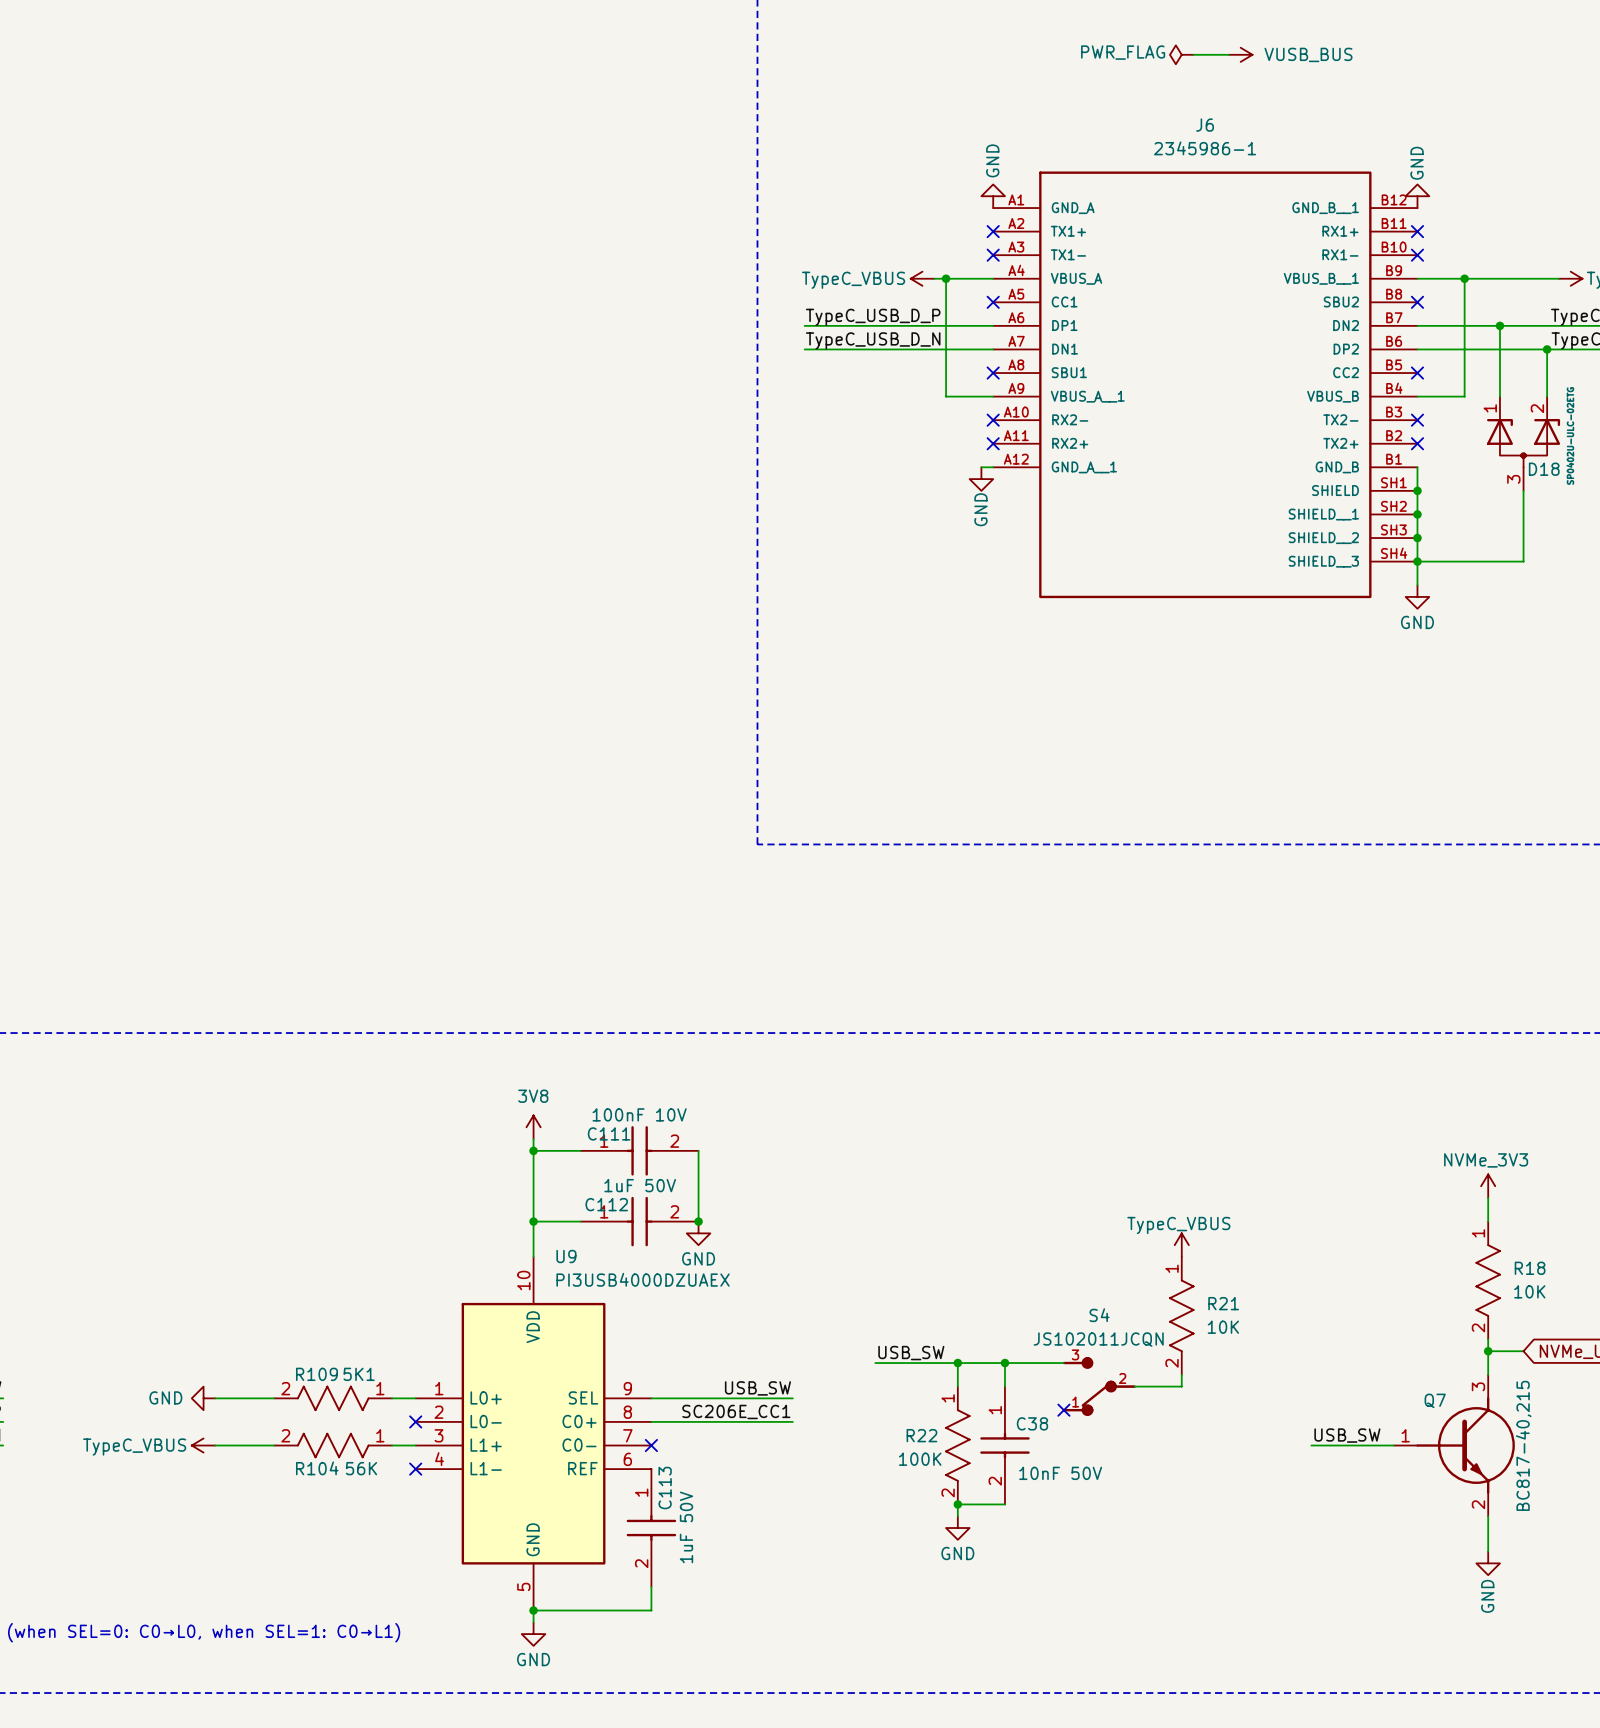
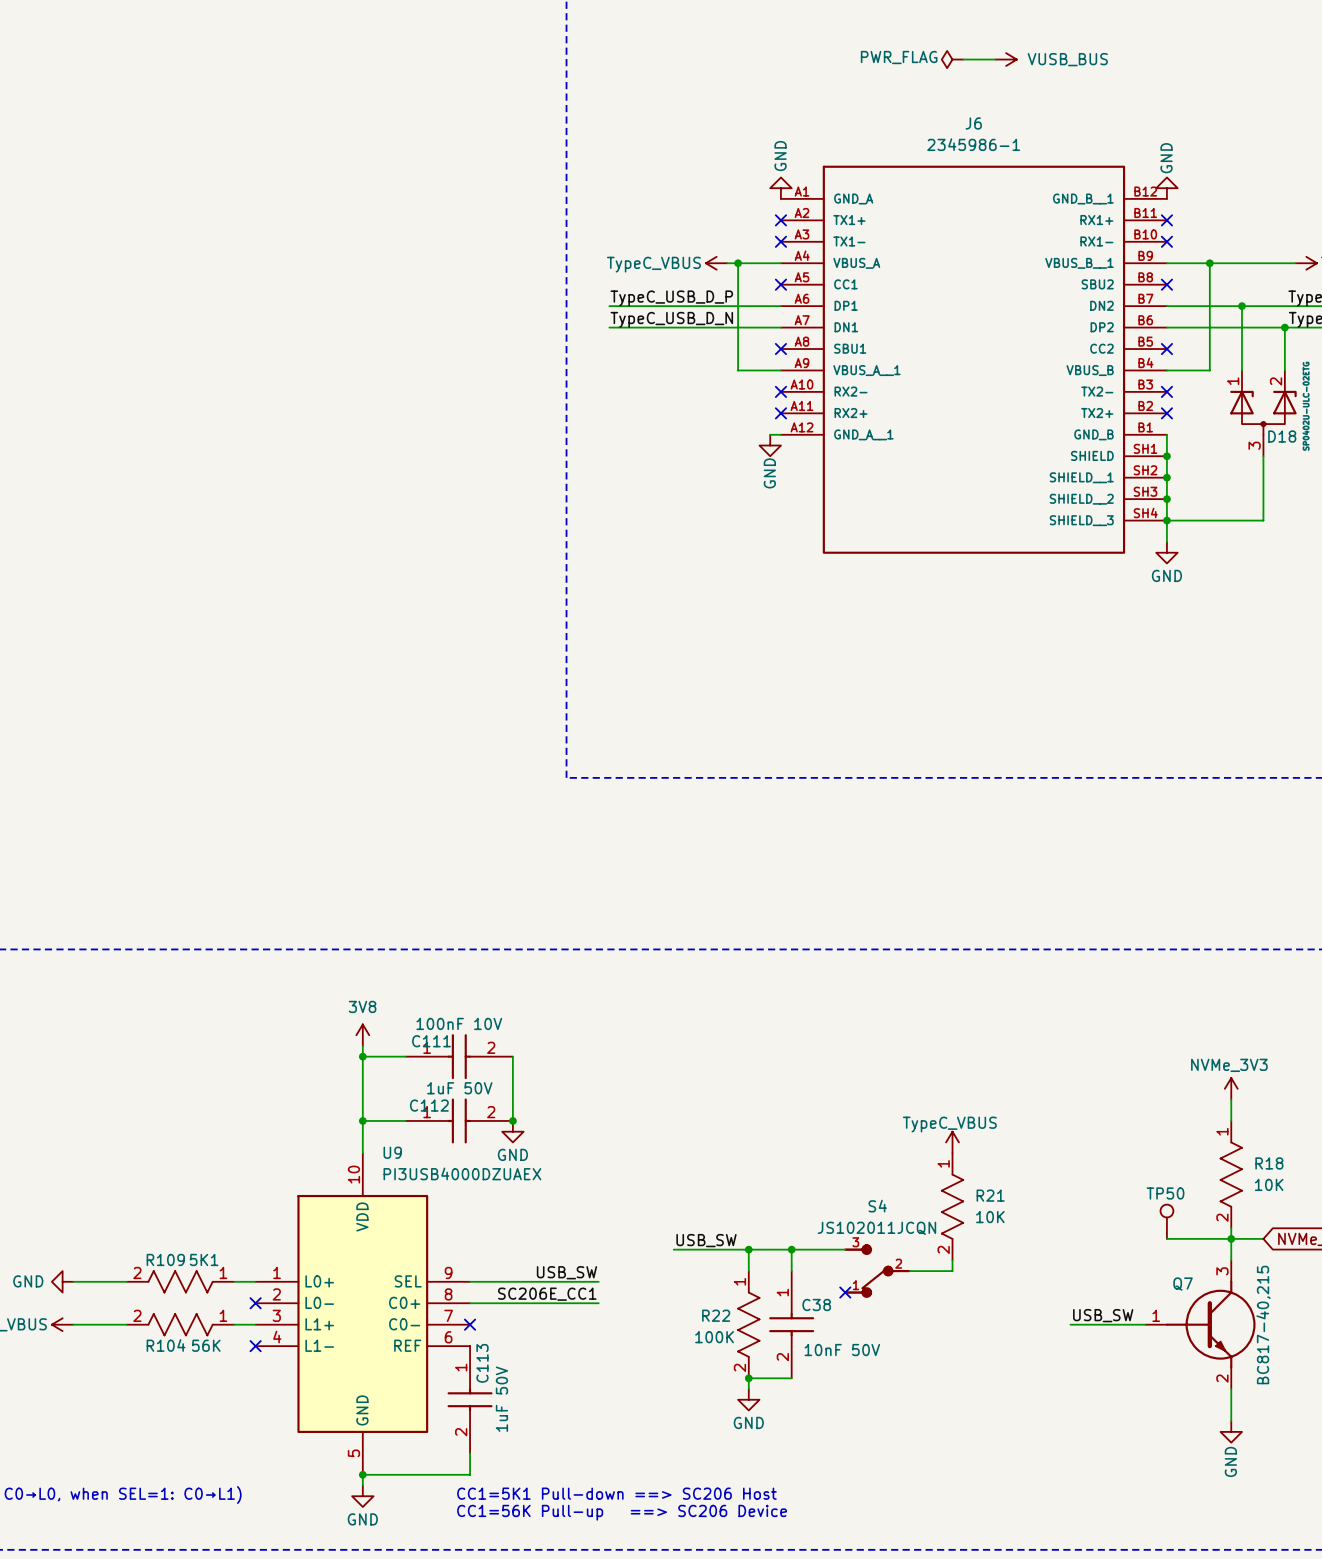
TP50: none -> (1166, 1221)
wire: none -> (1166, 1238) (1231, 1238)
text: none -> CC1=5K1 Pull-down ==> SC206 Host (616, 1493)
text: none -> CC1=56K Pull-up ==> SC206 Device (622, 1512)

